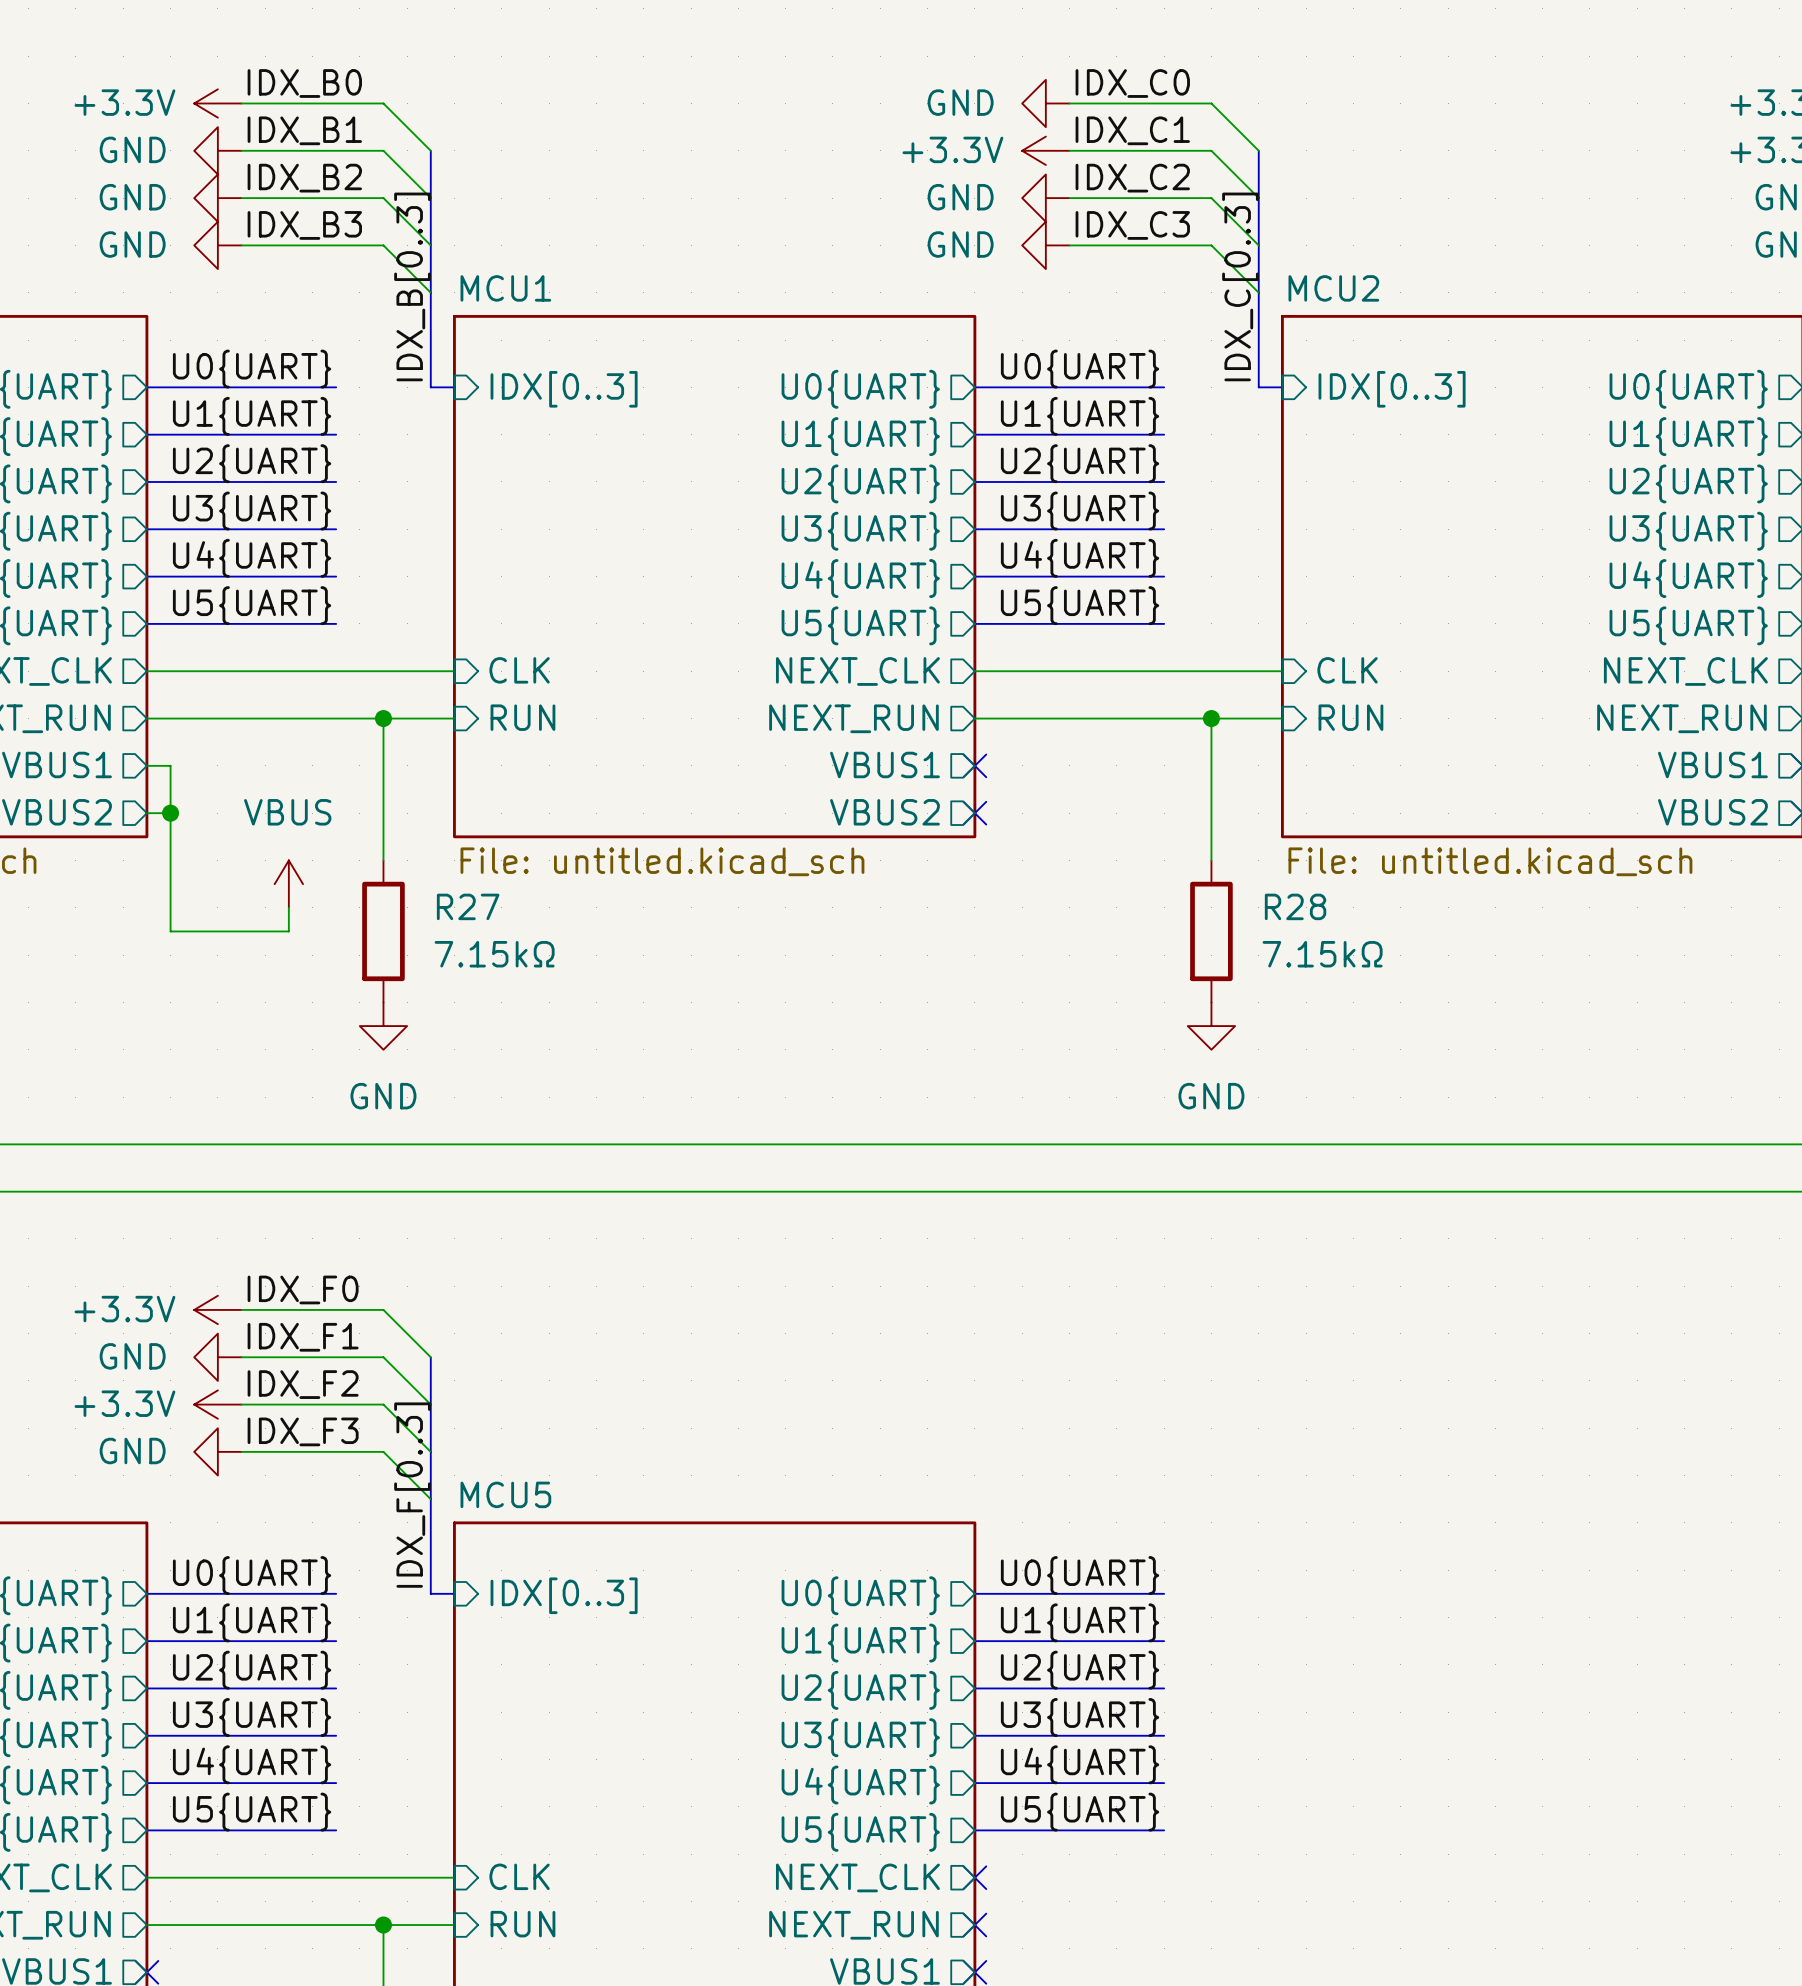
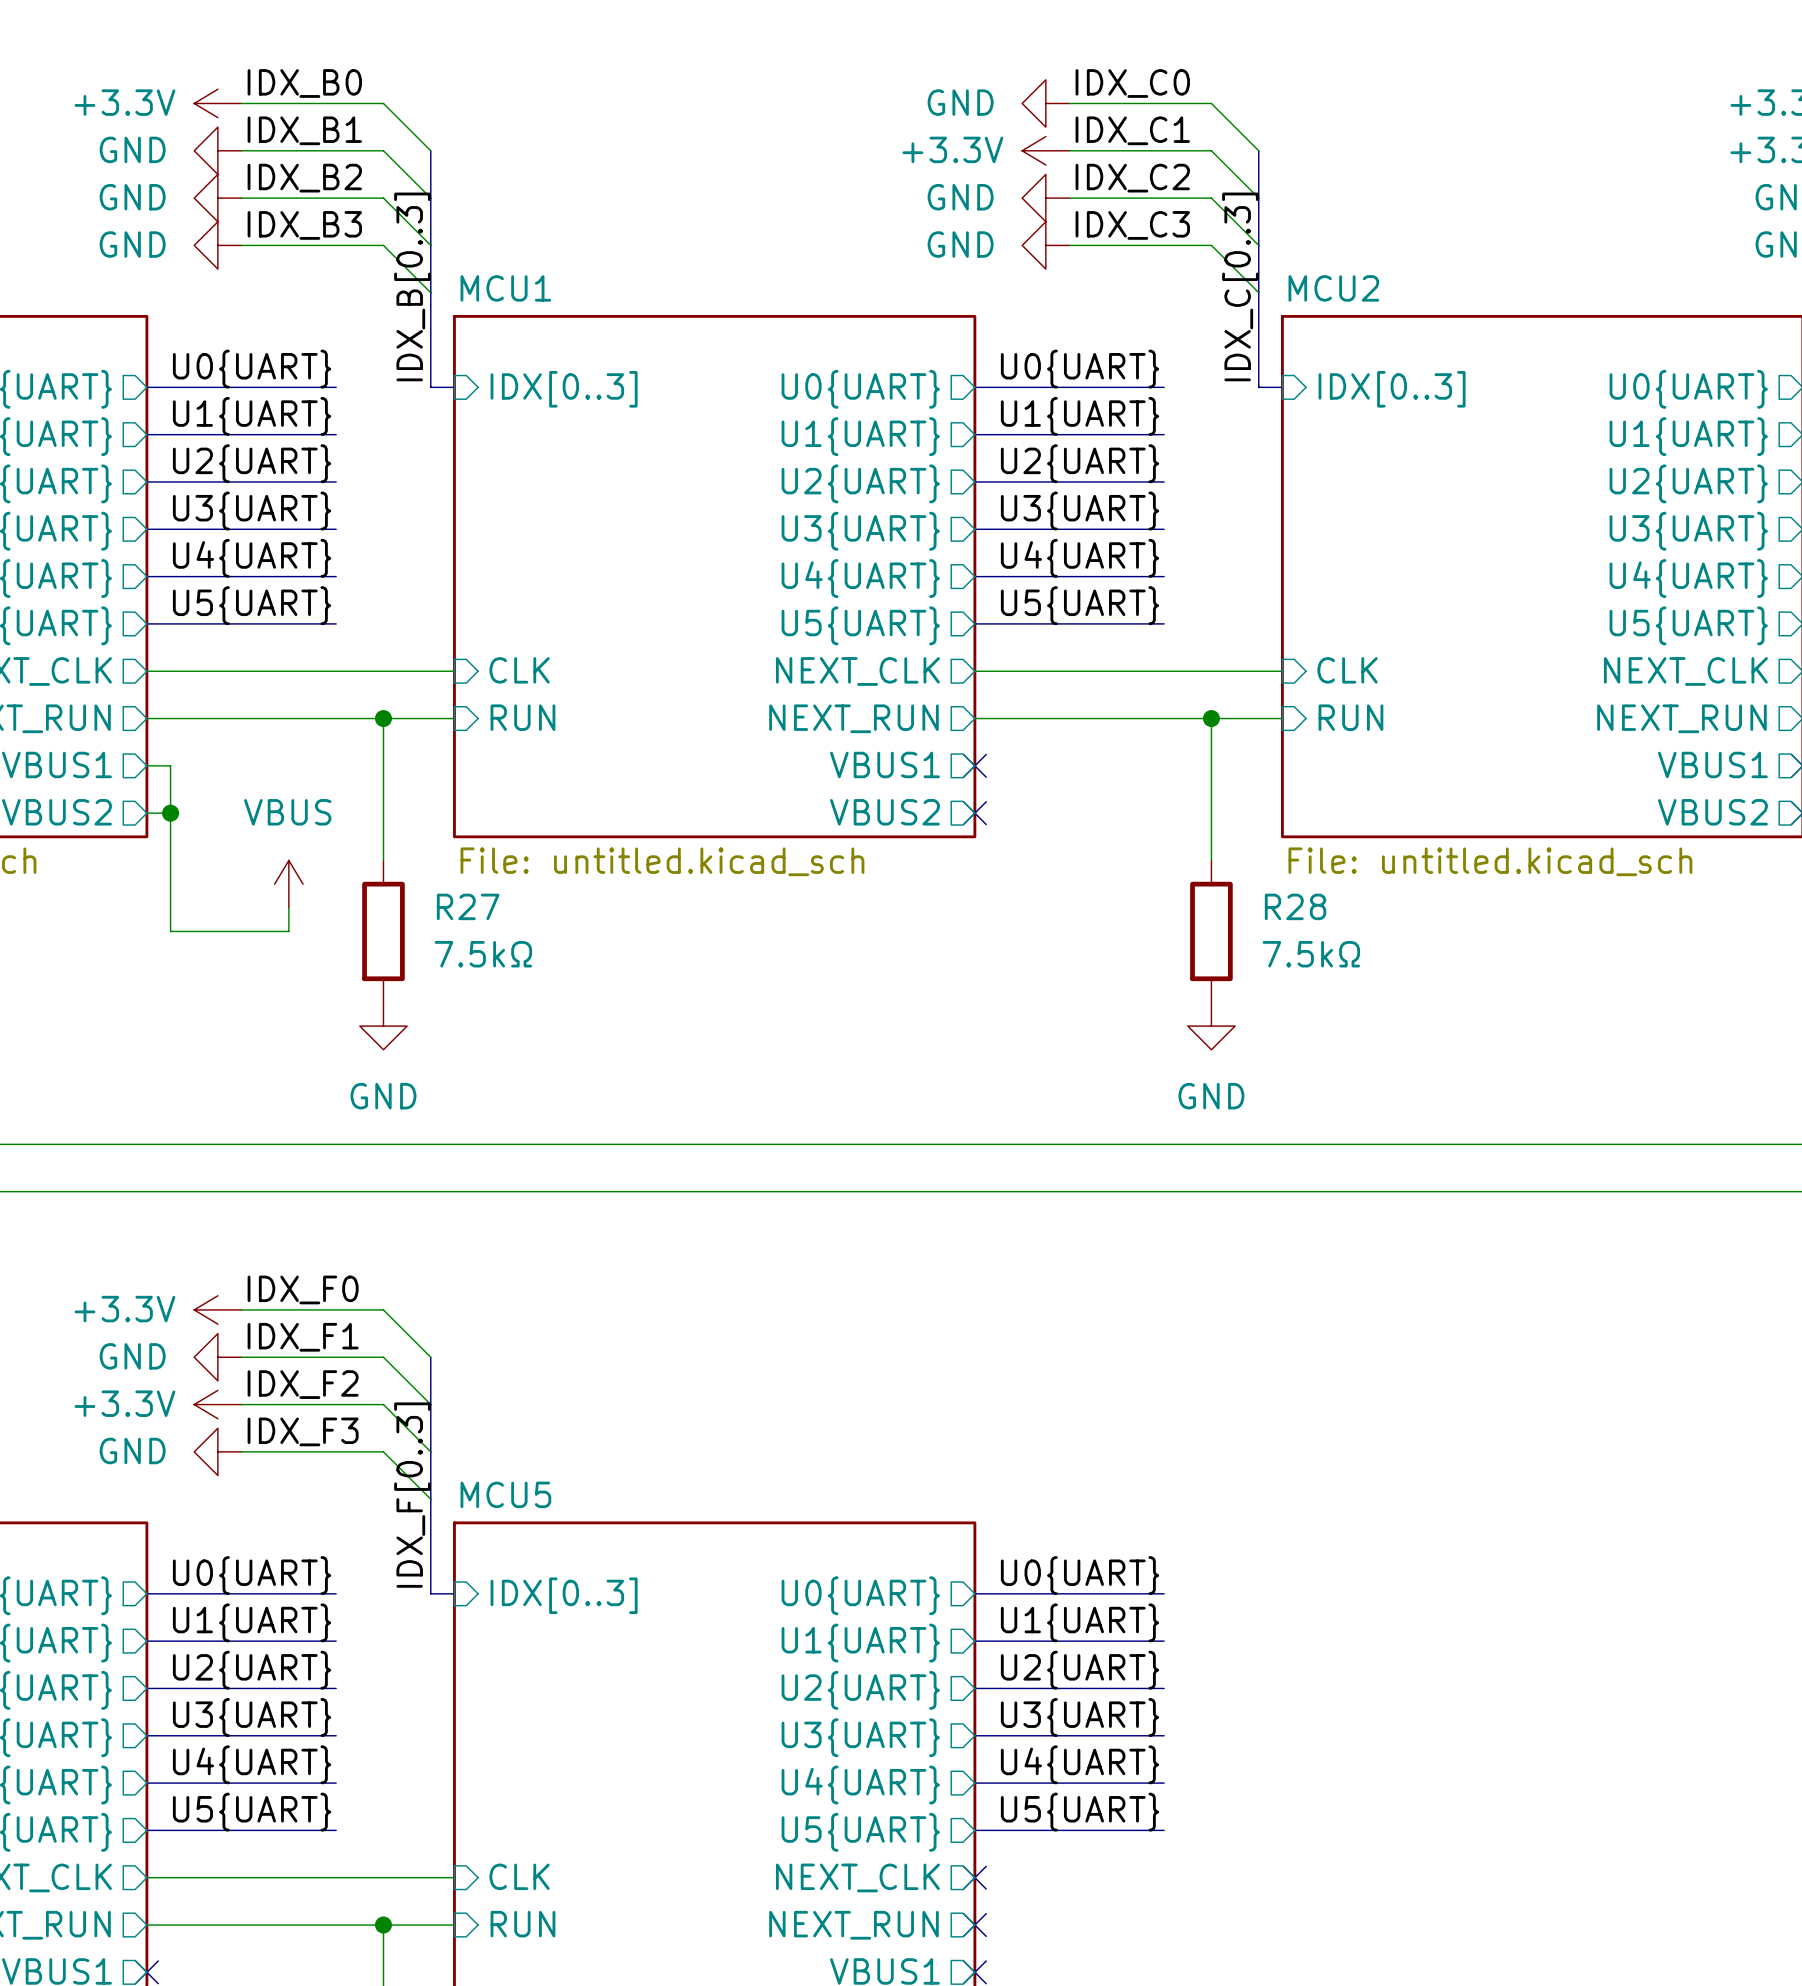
R27 value: 7.15kΩ (494, 954) -> 7.5kΩ (483, 954)
R28 value: 7.15kΩ (1322, 954) -> 7.5kΩ (1311, 954)

